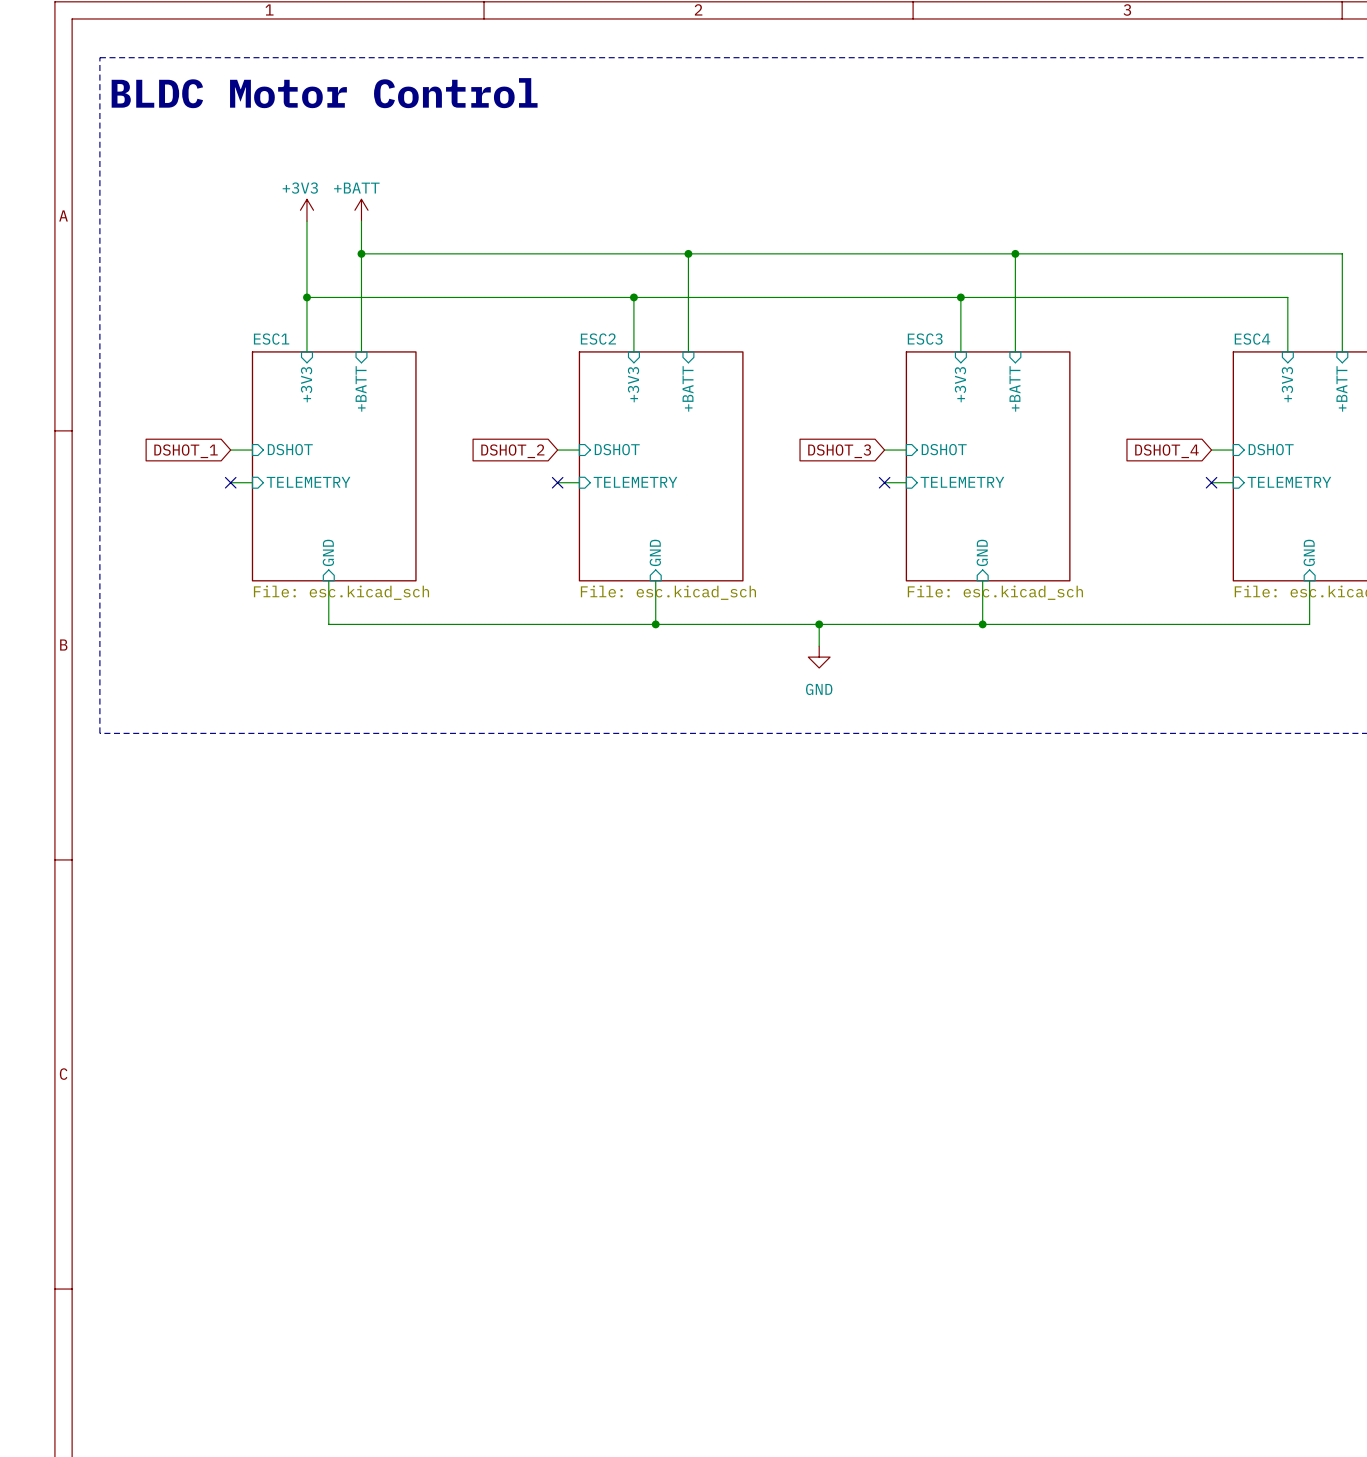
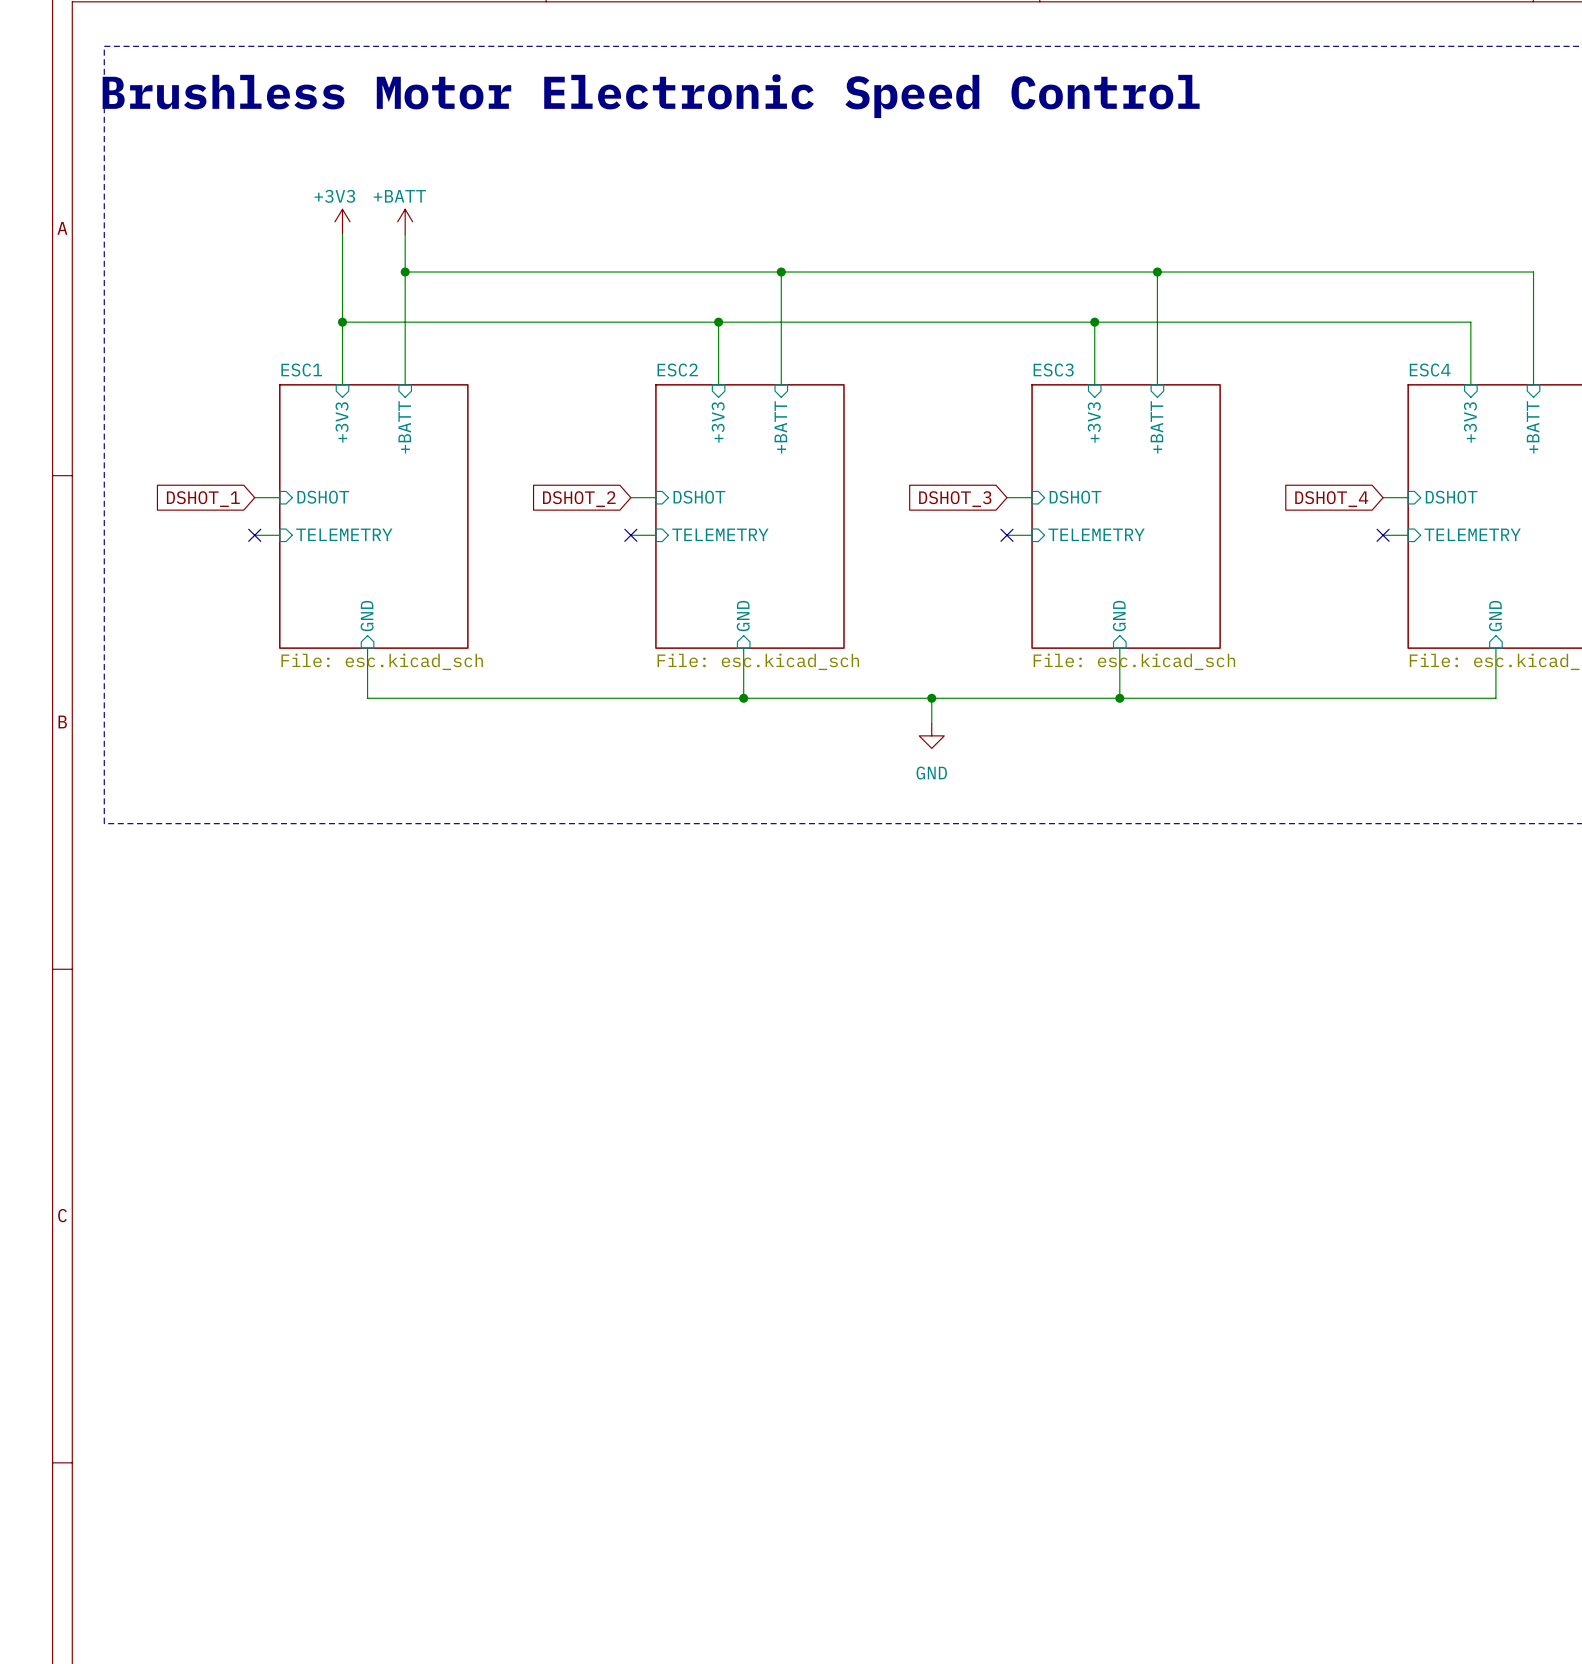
text: BLDC Motor Control (324, 93) -> none
text: none -> Brushless Motor Electronic Speed Control (651, 96)

